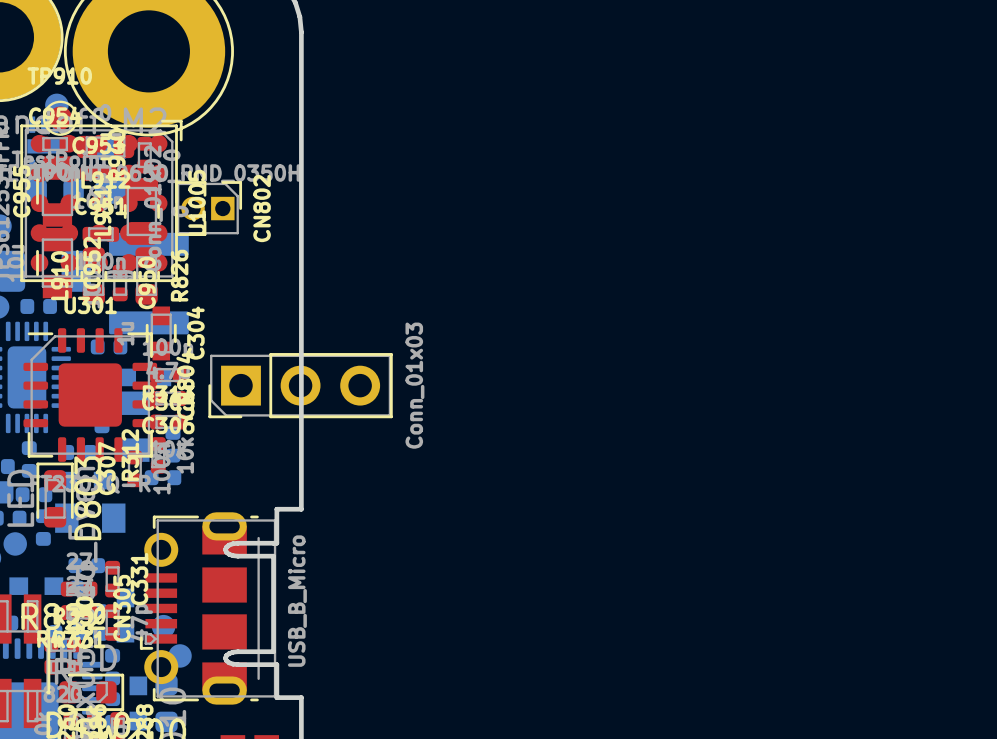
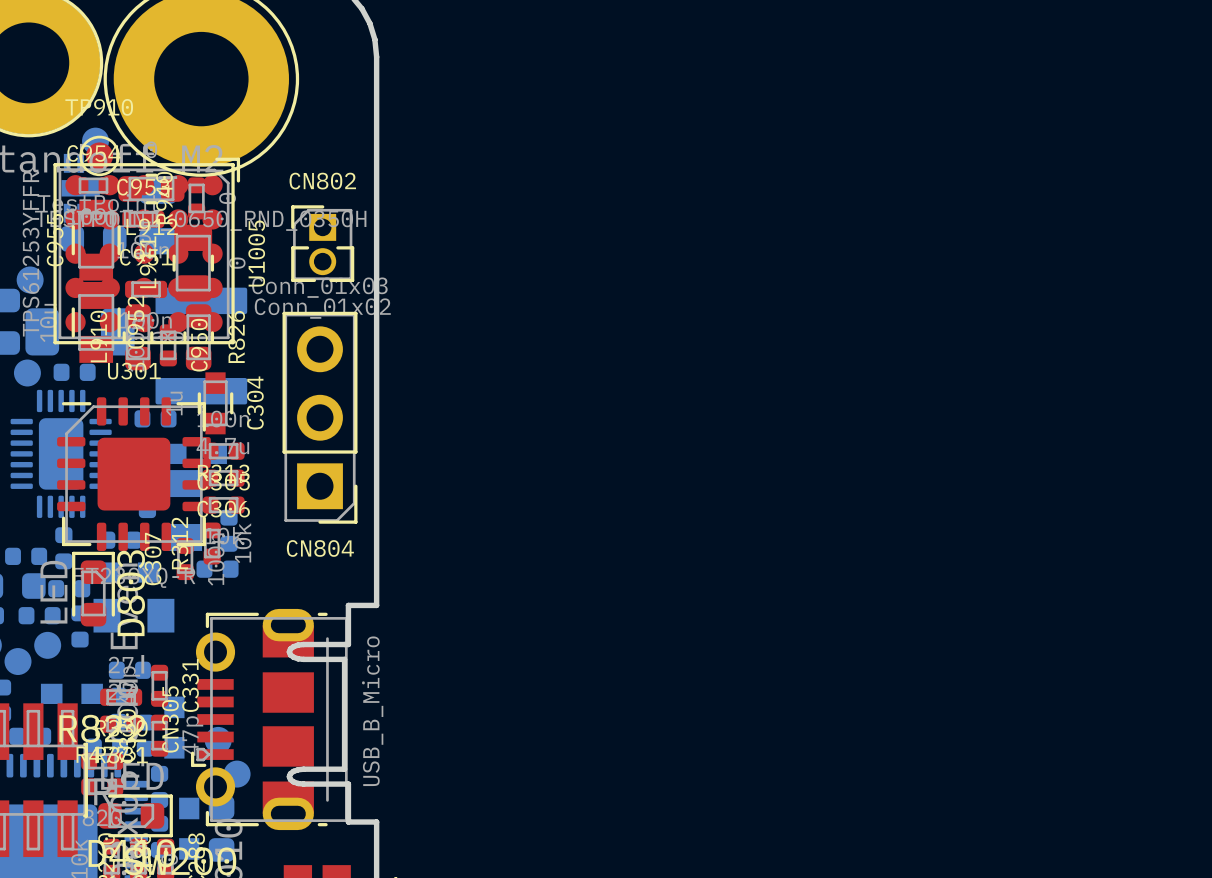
CN802 rotation: 0° (208, 208) -> 90° counterclockwise (322, 243)
CN802 position: (208, 208) -> (322, 243)
CN804 rotation: 0° (300, 385) -> 90° counterclockwise (320, 417)

